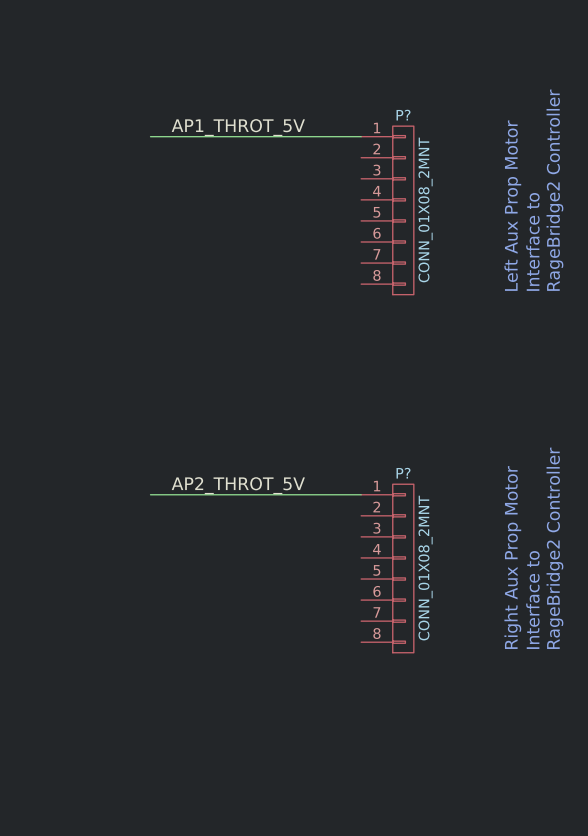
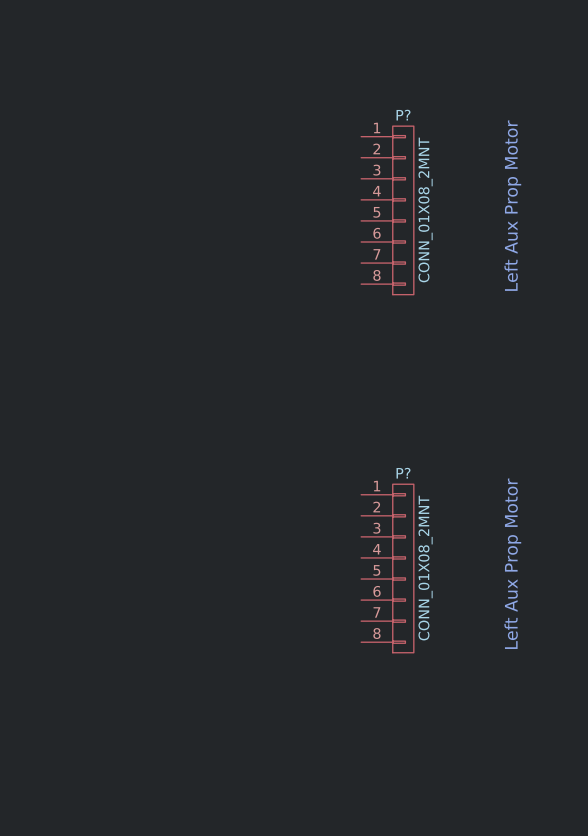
label: AP1_THROT_5V (238, 127) -> none
wire: (150, 136) (361, 136) -> none
text: RageBridge2 Controller (554, 190) -> none
text: Interface to (532, 241) -> none
label: AP2_THROT_5V (238, 485) -> none
wire: (150, 494) (361, 494) -> none
text: RageBridge2 Controller (554, 548) -> none
text: Right Aux Prop Motor (512, 557) -> Left Aux Prop Motor (512, 563)
text: Interface to (532, 600) -> none

